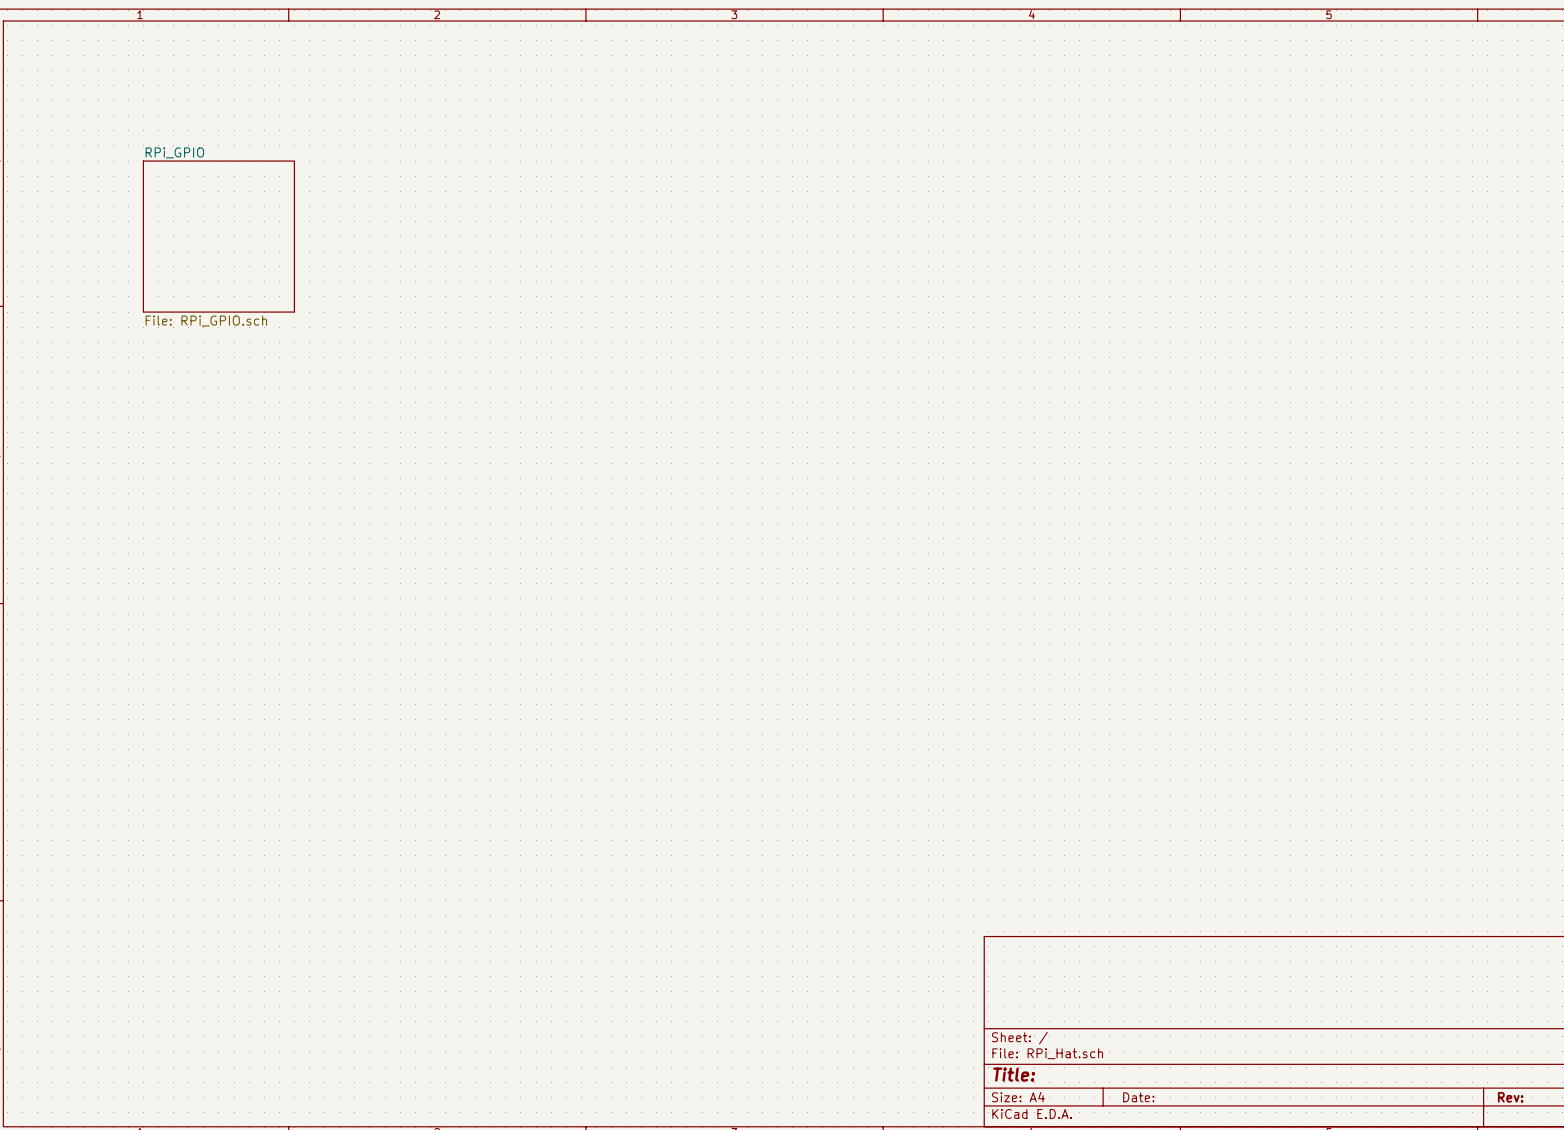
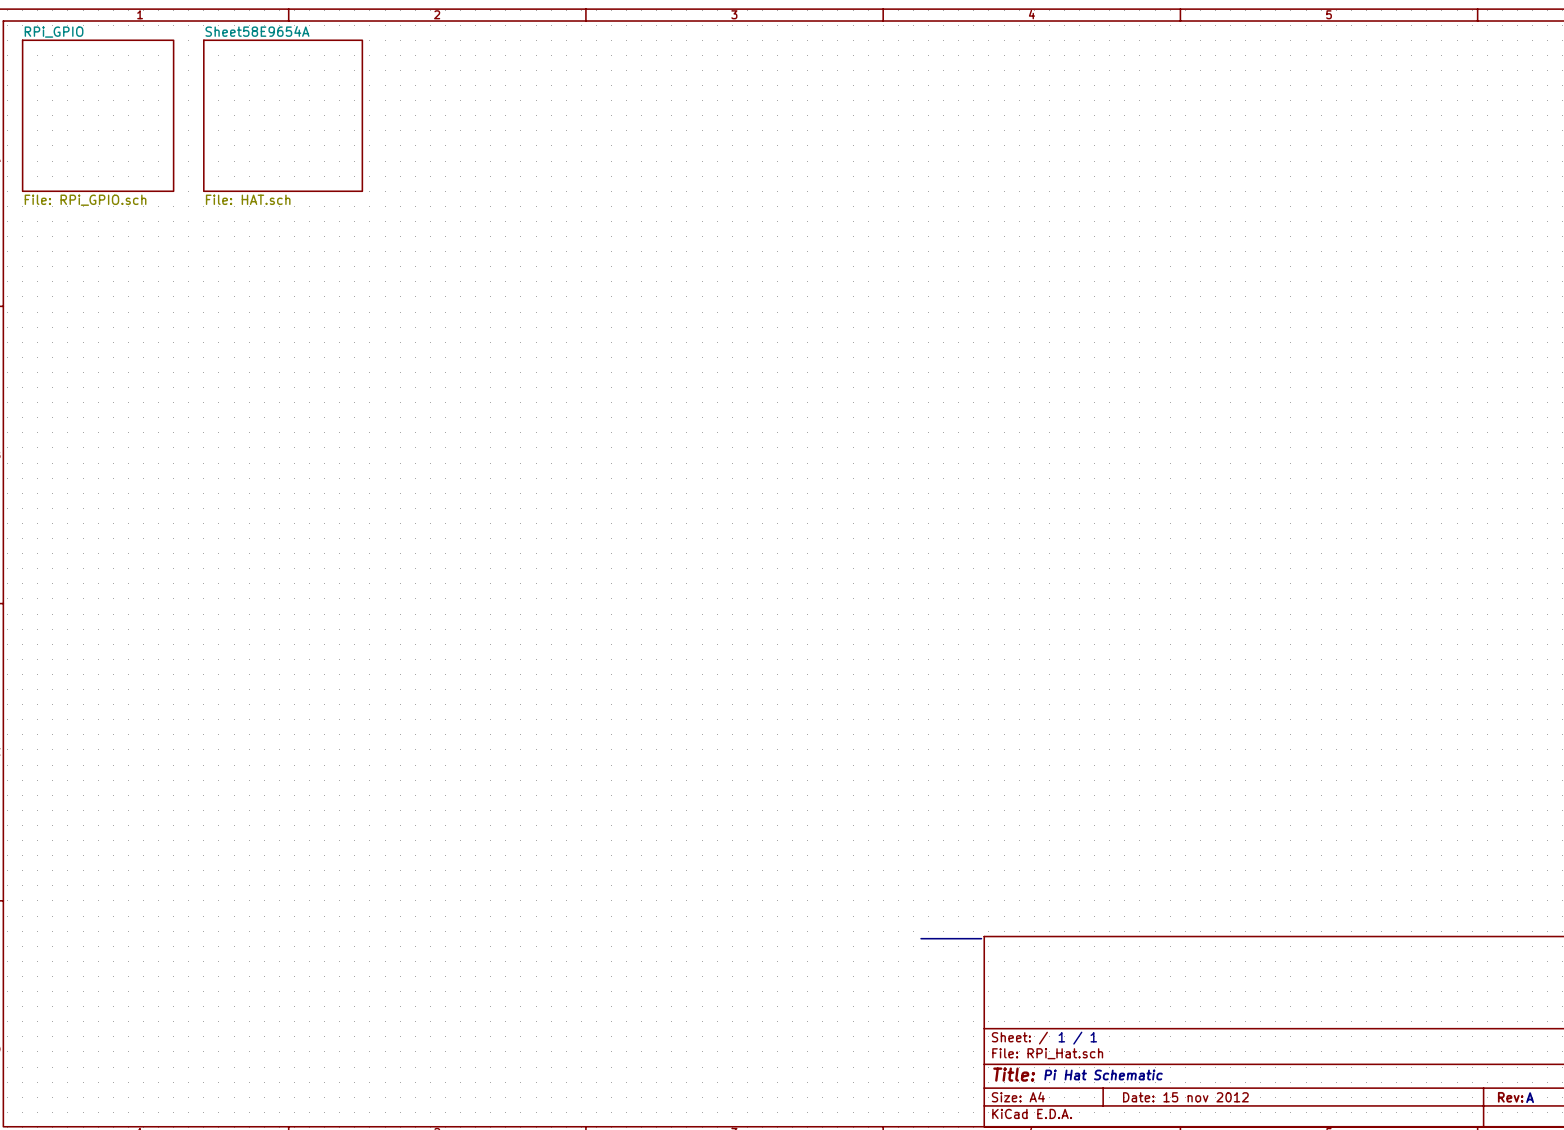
sheet RPi_GPIO: none -> File: RPi_GPIO.sch (98, 115)
sheet Sheet58E9654A: none -> File: HAT.sch (283, 115)
sheet RPi_GPIO: File: RPi_GPIO.sch (218, 236) -> none
bus: none -> (921, 938) (981, 938)
text: none -> 1 / 1 (1077, 1038)
text: none -> Pi Hat Schematic (1103, 1075)
title block: Date: (1138, 1097) -> Date: 15 nov 2012 (1185, 1097)
text: none -> A (1530, 1097)

